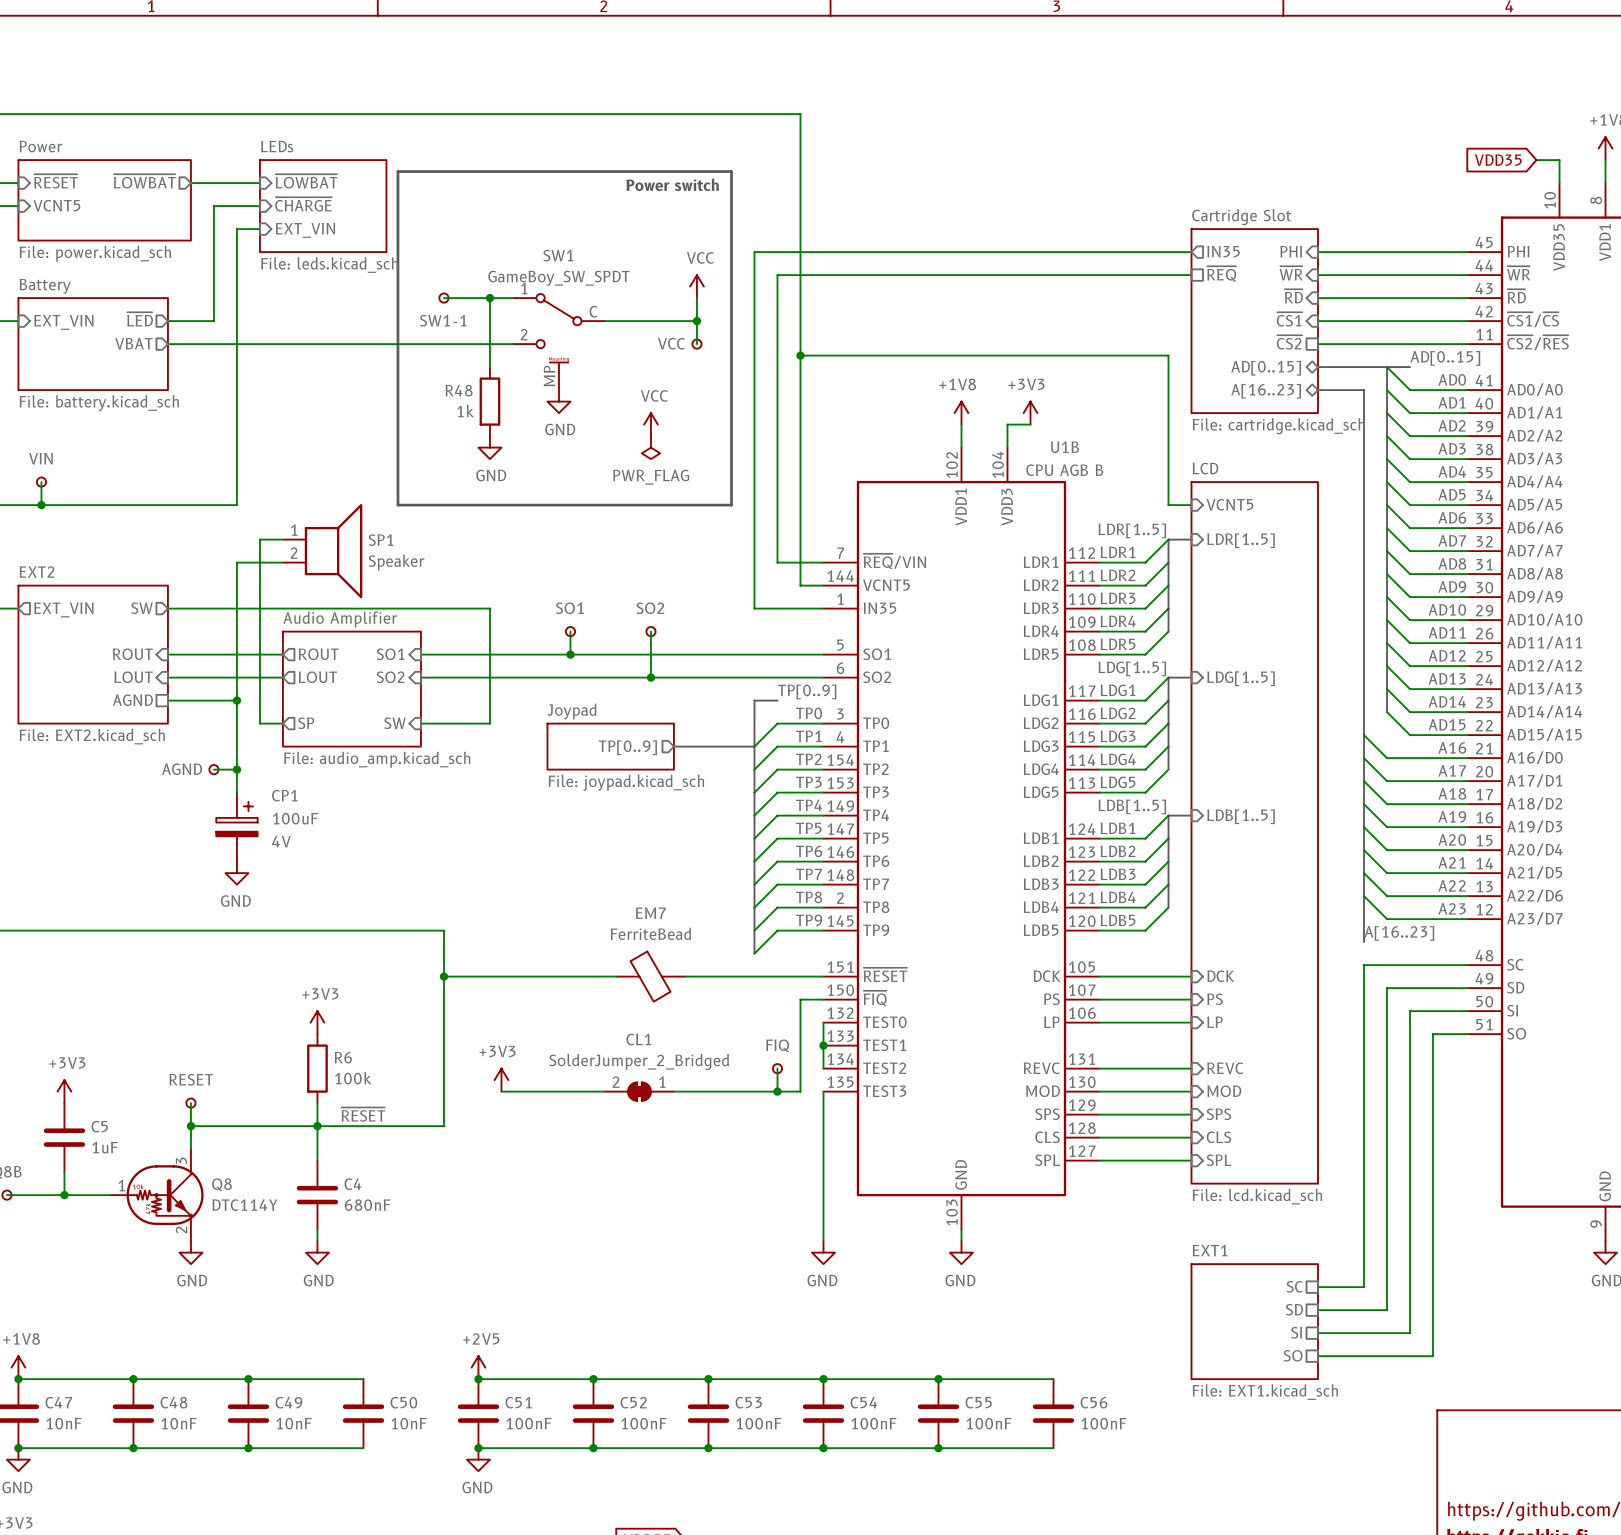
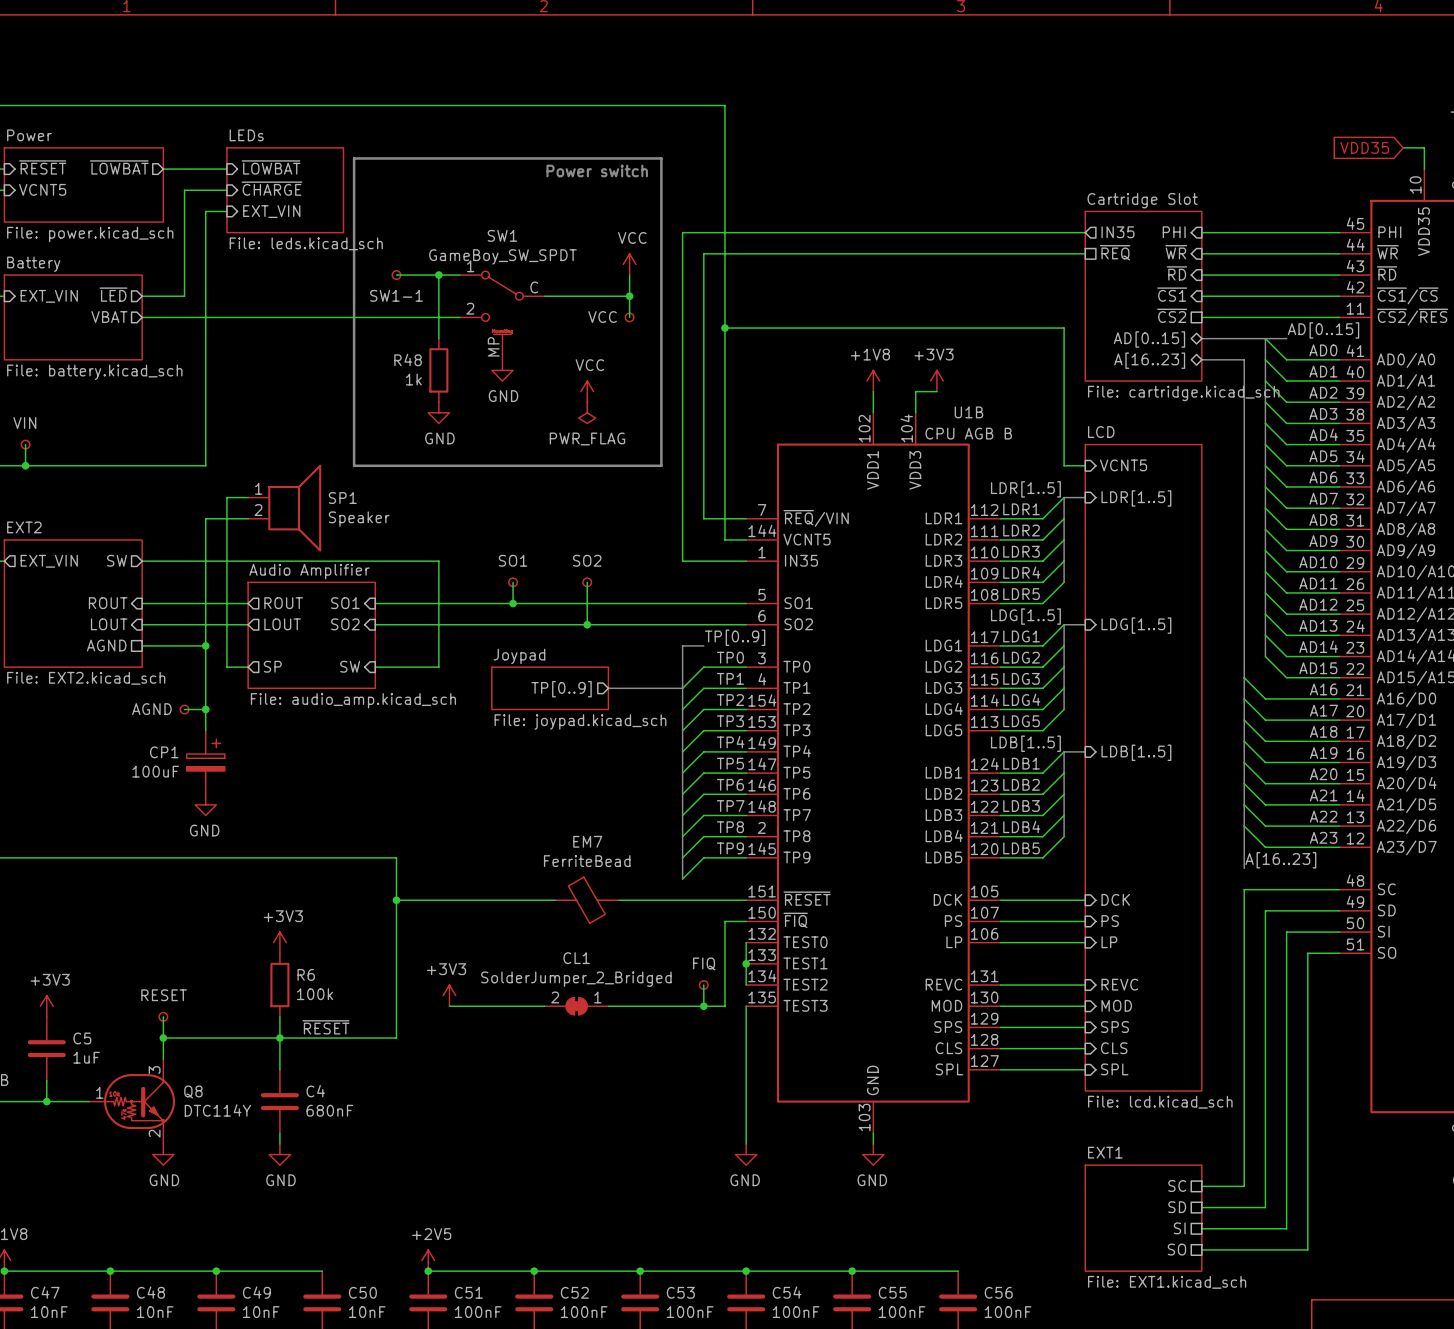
CP1 name position: CP1 (284, 795) -> CP1 (164, 752)
CP1 value position: 100uF (295, 818) -> 100uF (155, 771)
CP1 text: 4V (281, 841) -> none

